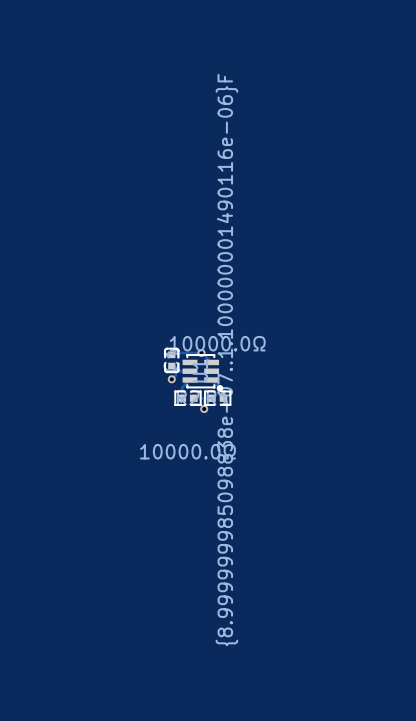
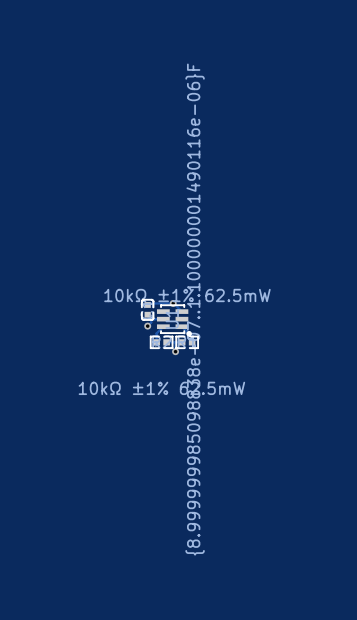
part value: 10000.0Ω (217, 343) -> 10kΩ ±1% 62.5mW (187, 295)
part value: 10000.0Ω (187, 451) -> 10kΩ ±1% 62.5mW (161, 388)

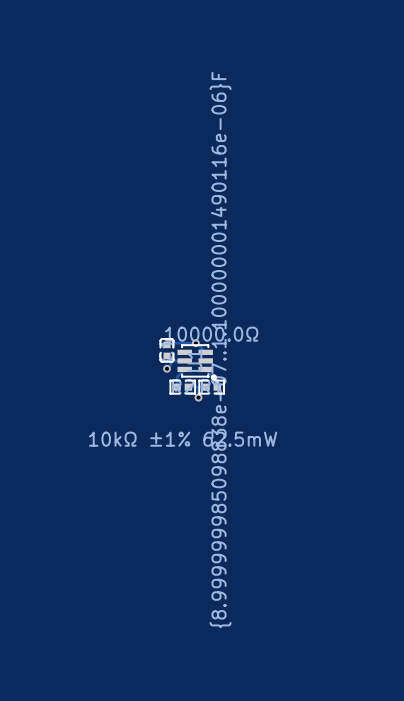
part value: 10kΩ ±1% 62.5mW (187, 295) -> 10000.0Ω (211, 334)

